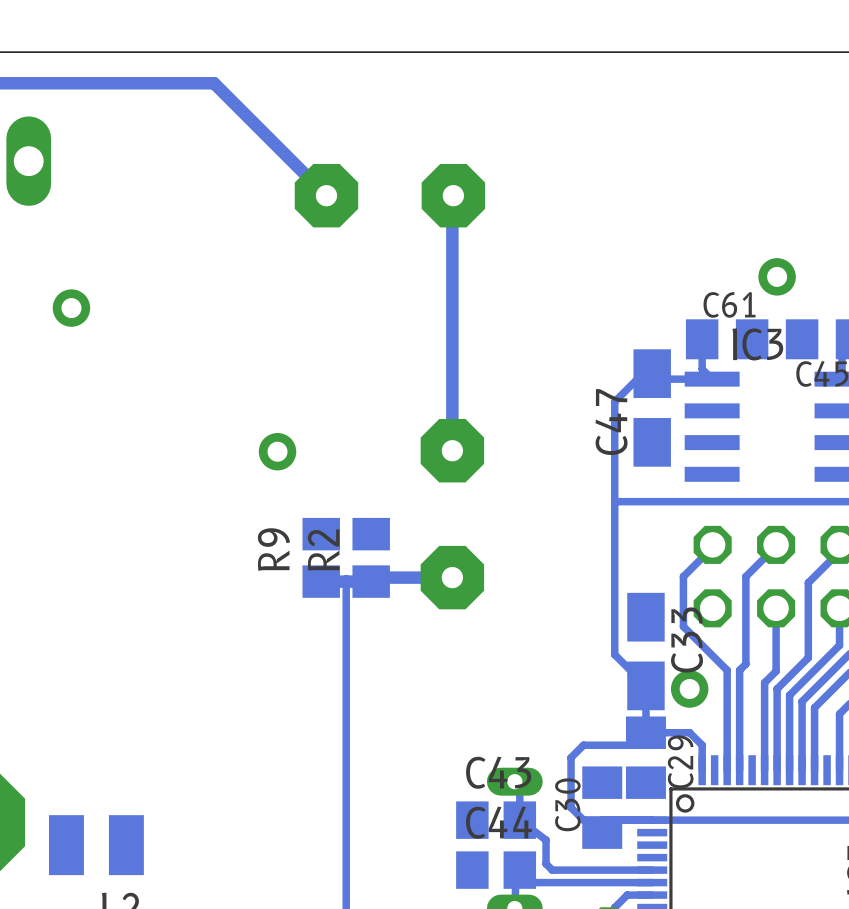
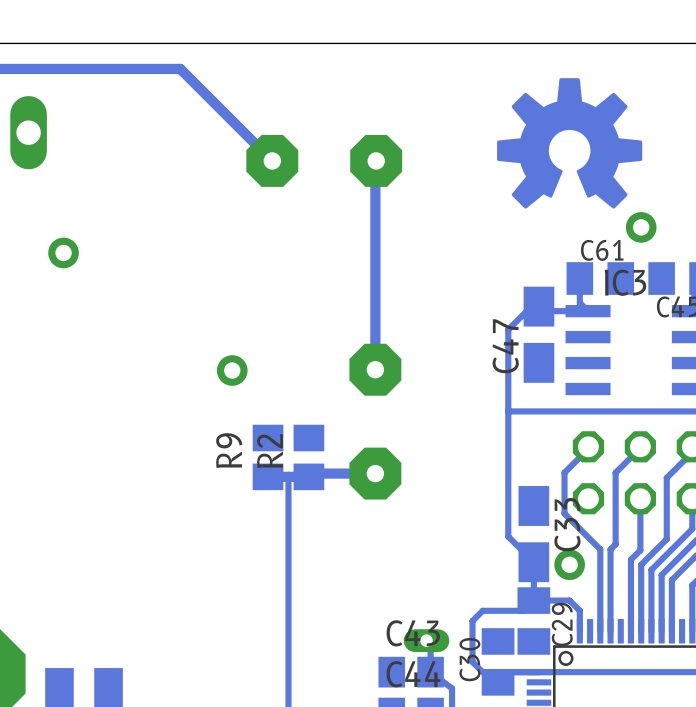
drawing: none -> [497, 78, 643, 209]

